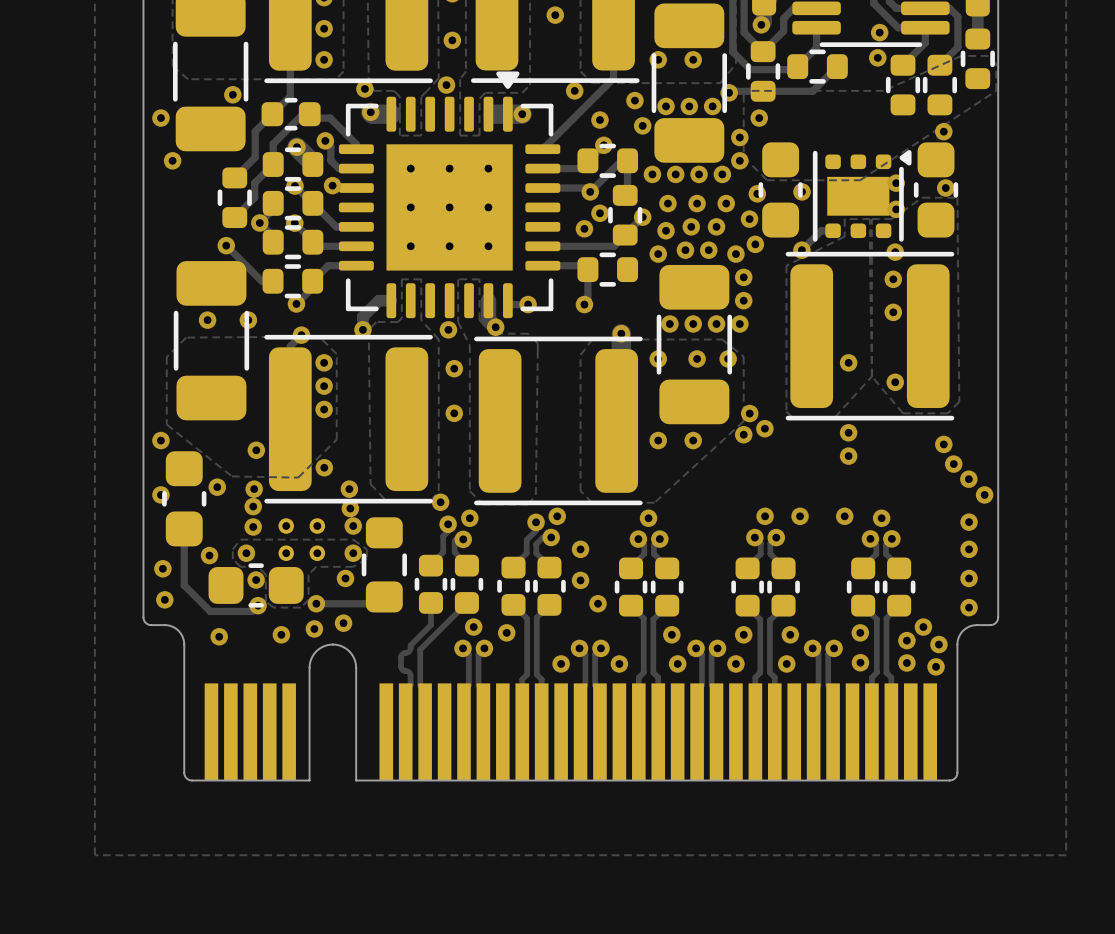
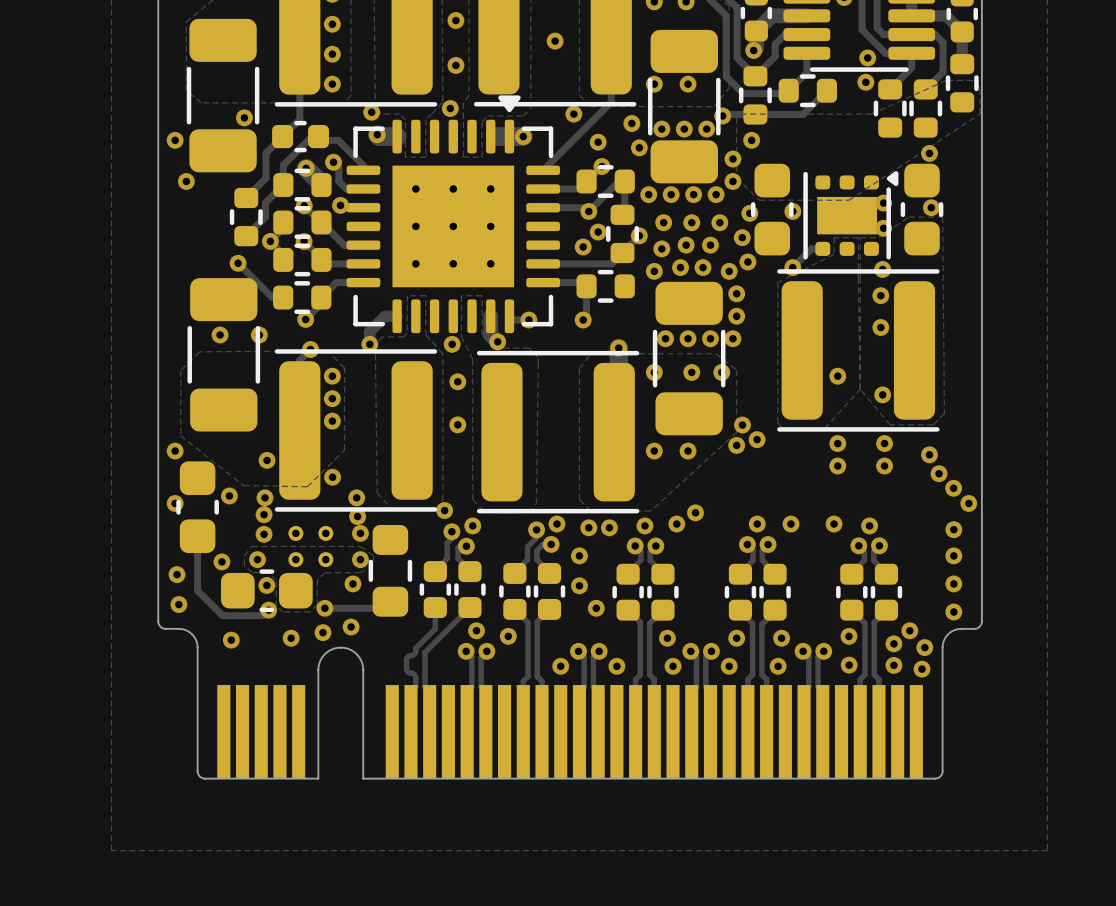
via: none -> (884, 443)
via: none -> (884, 466)
via: none -> (695, 512)
via: none -> (676, 524)
via: none -> (588, 527)
via: none -> (609, 527)

